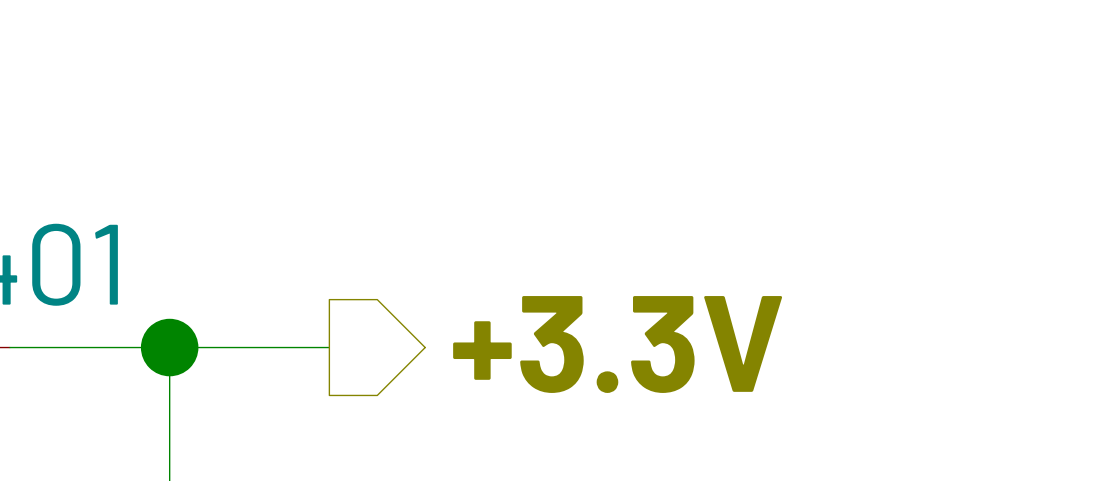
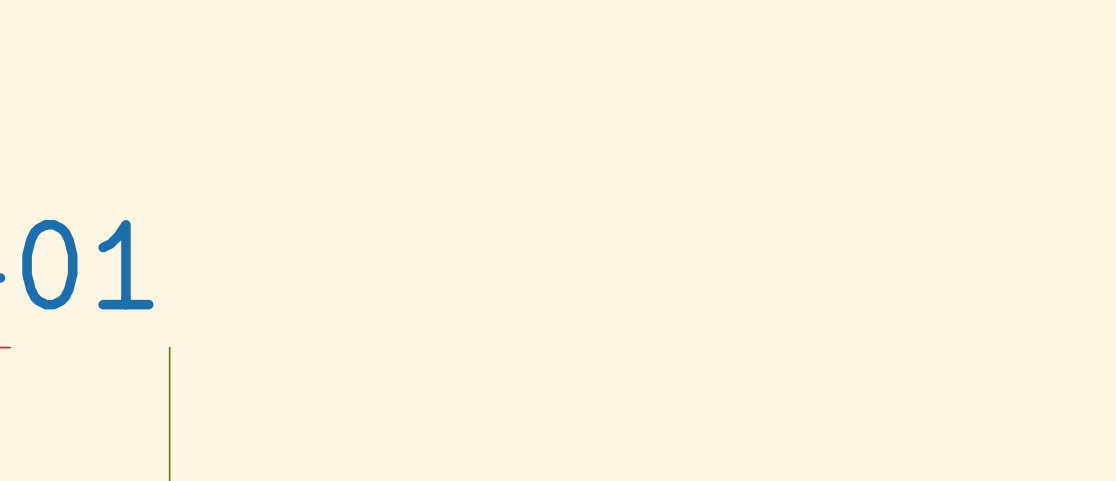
hierarchical label: +3.3V (617, 344) -> none
wire: (9, 347) (329, 347) -> none
junction: (169, 347) -> none

